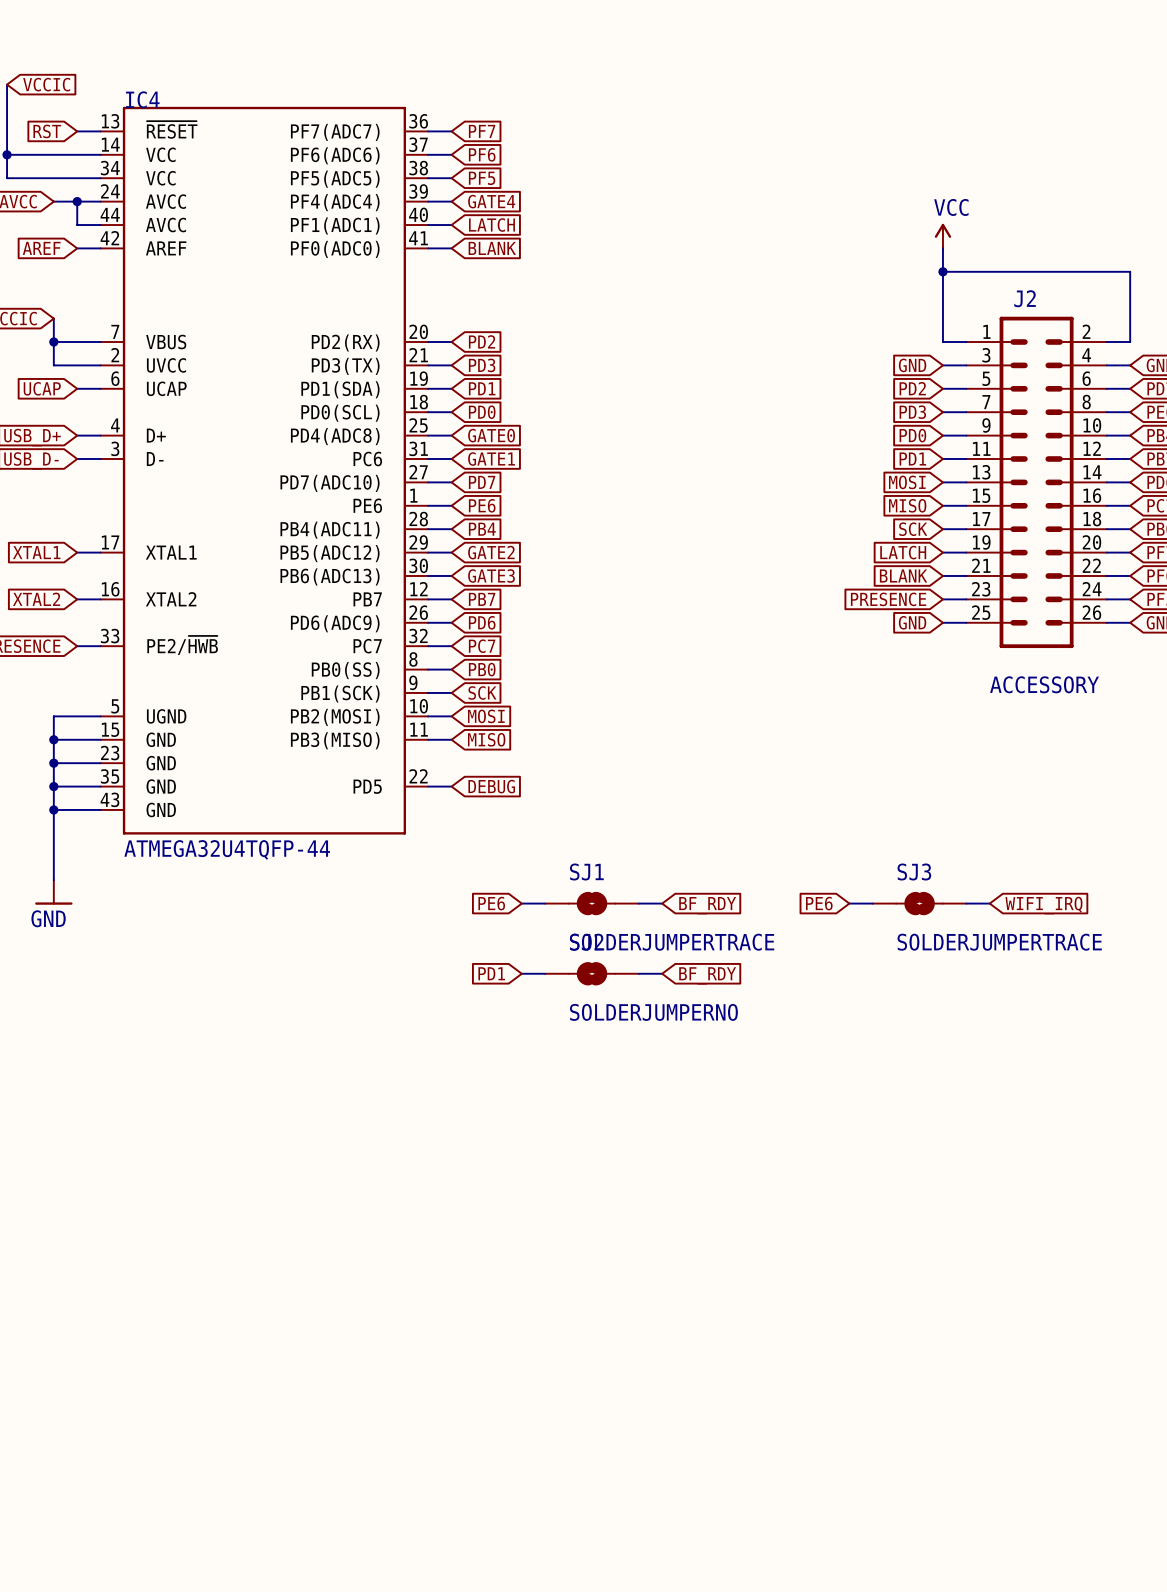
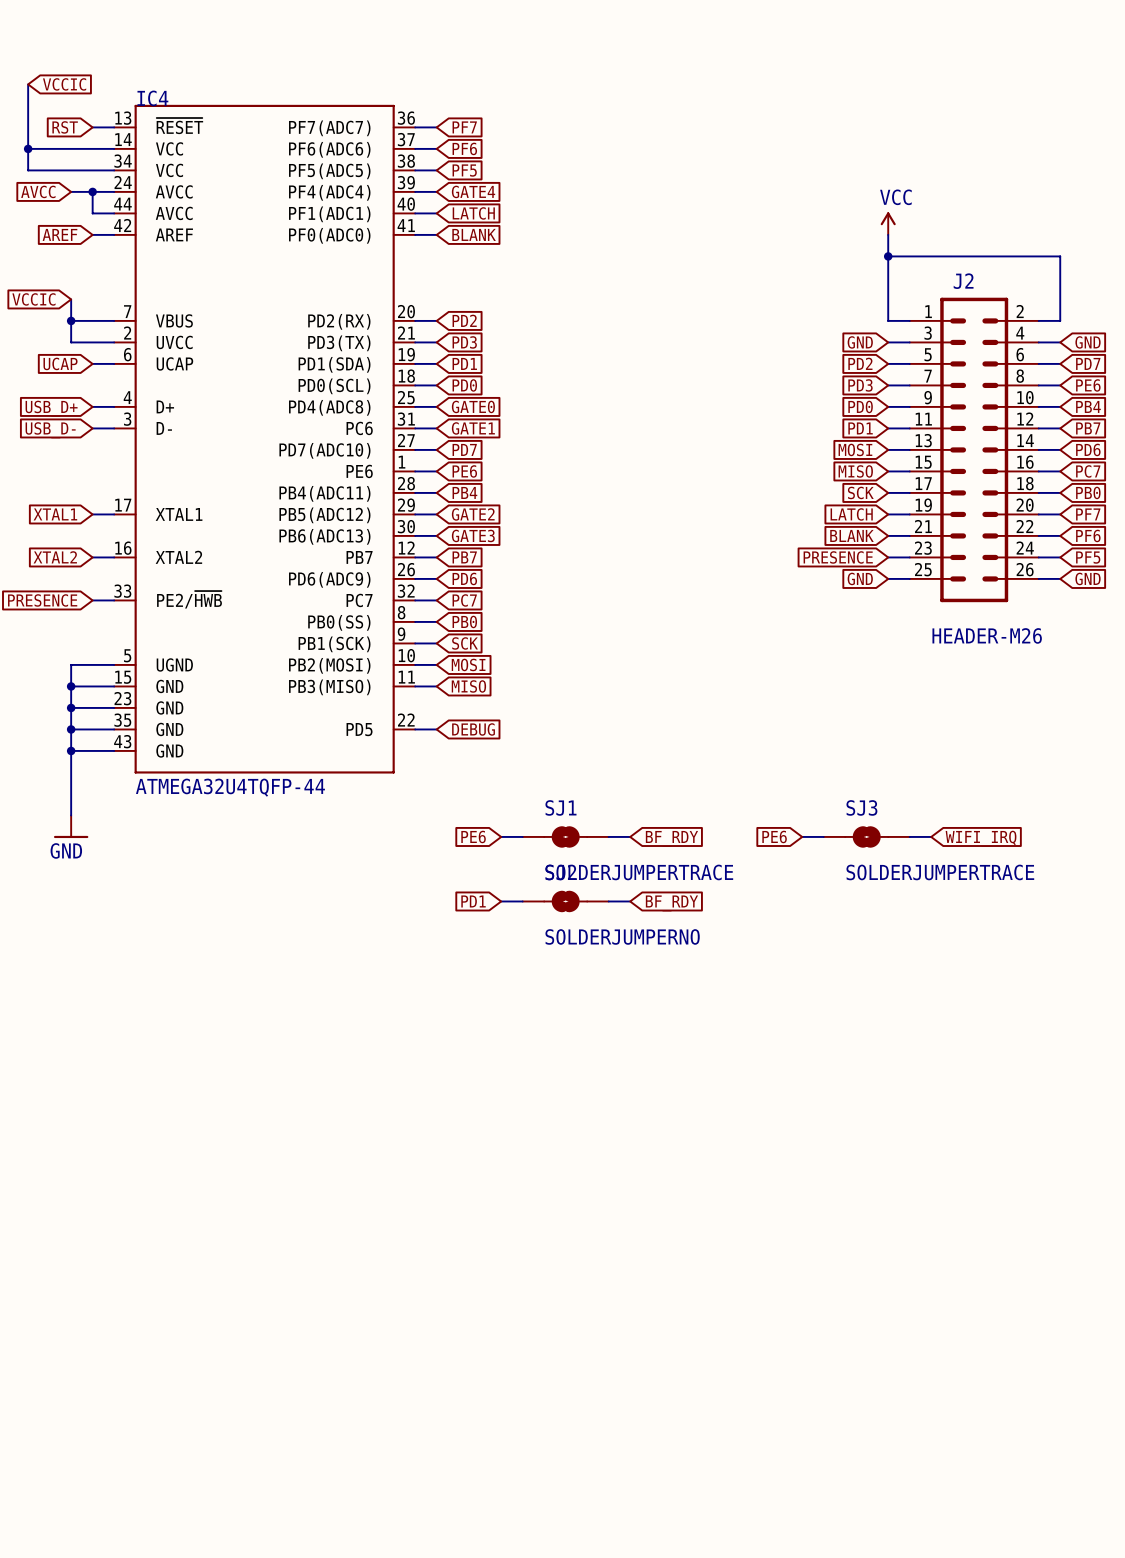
J2 value: ACCESSORY (1044, 684) -> HEADER-M26 (987, 635)

